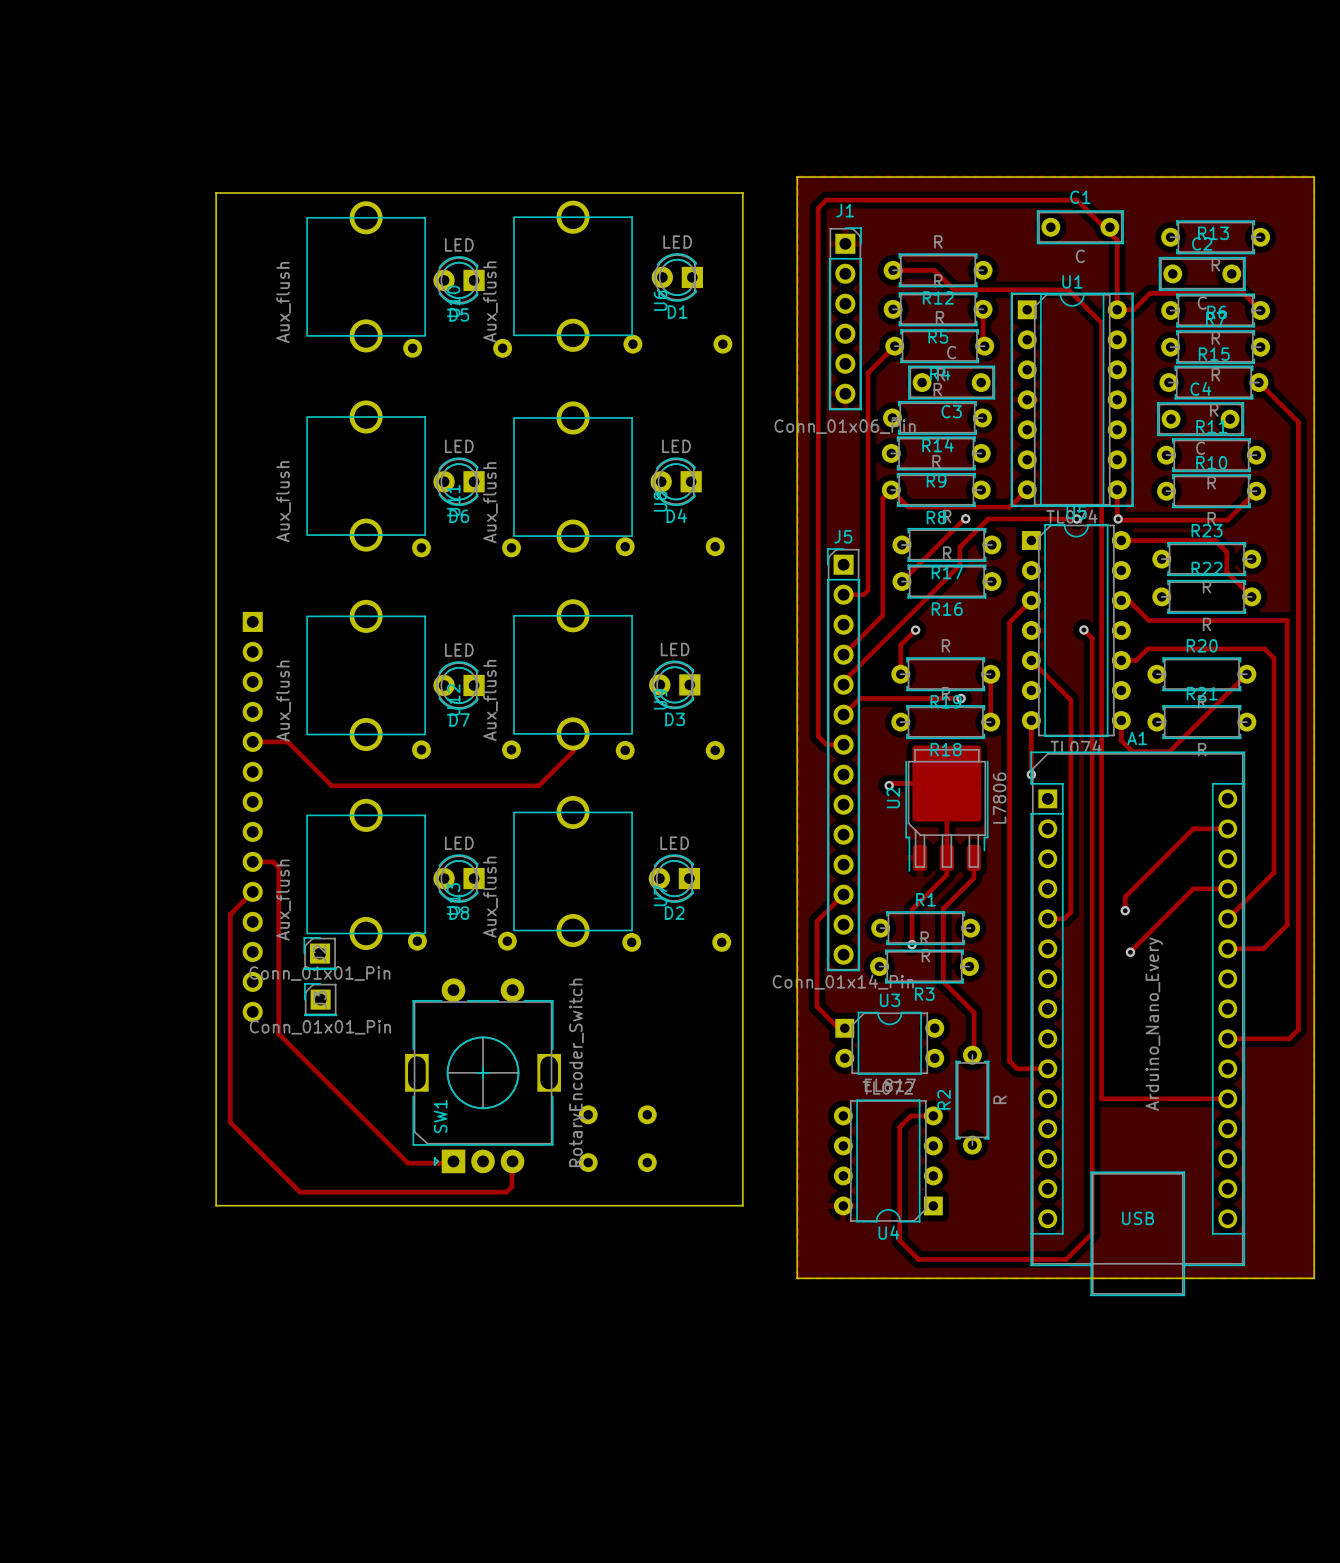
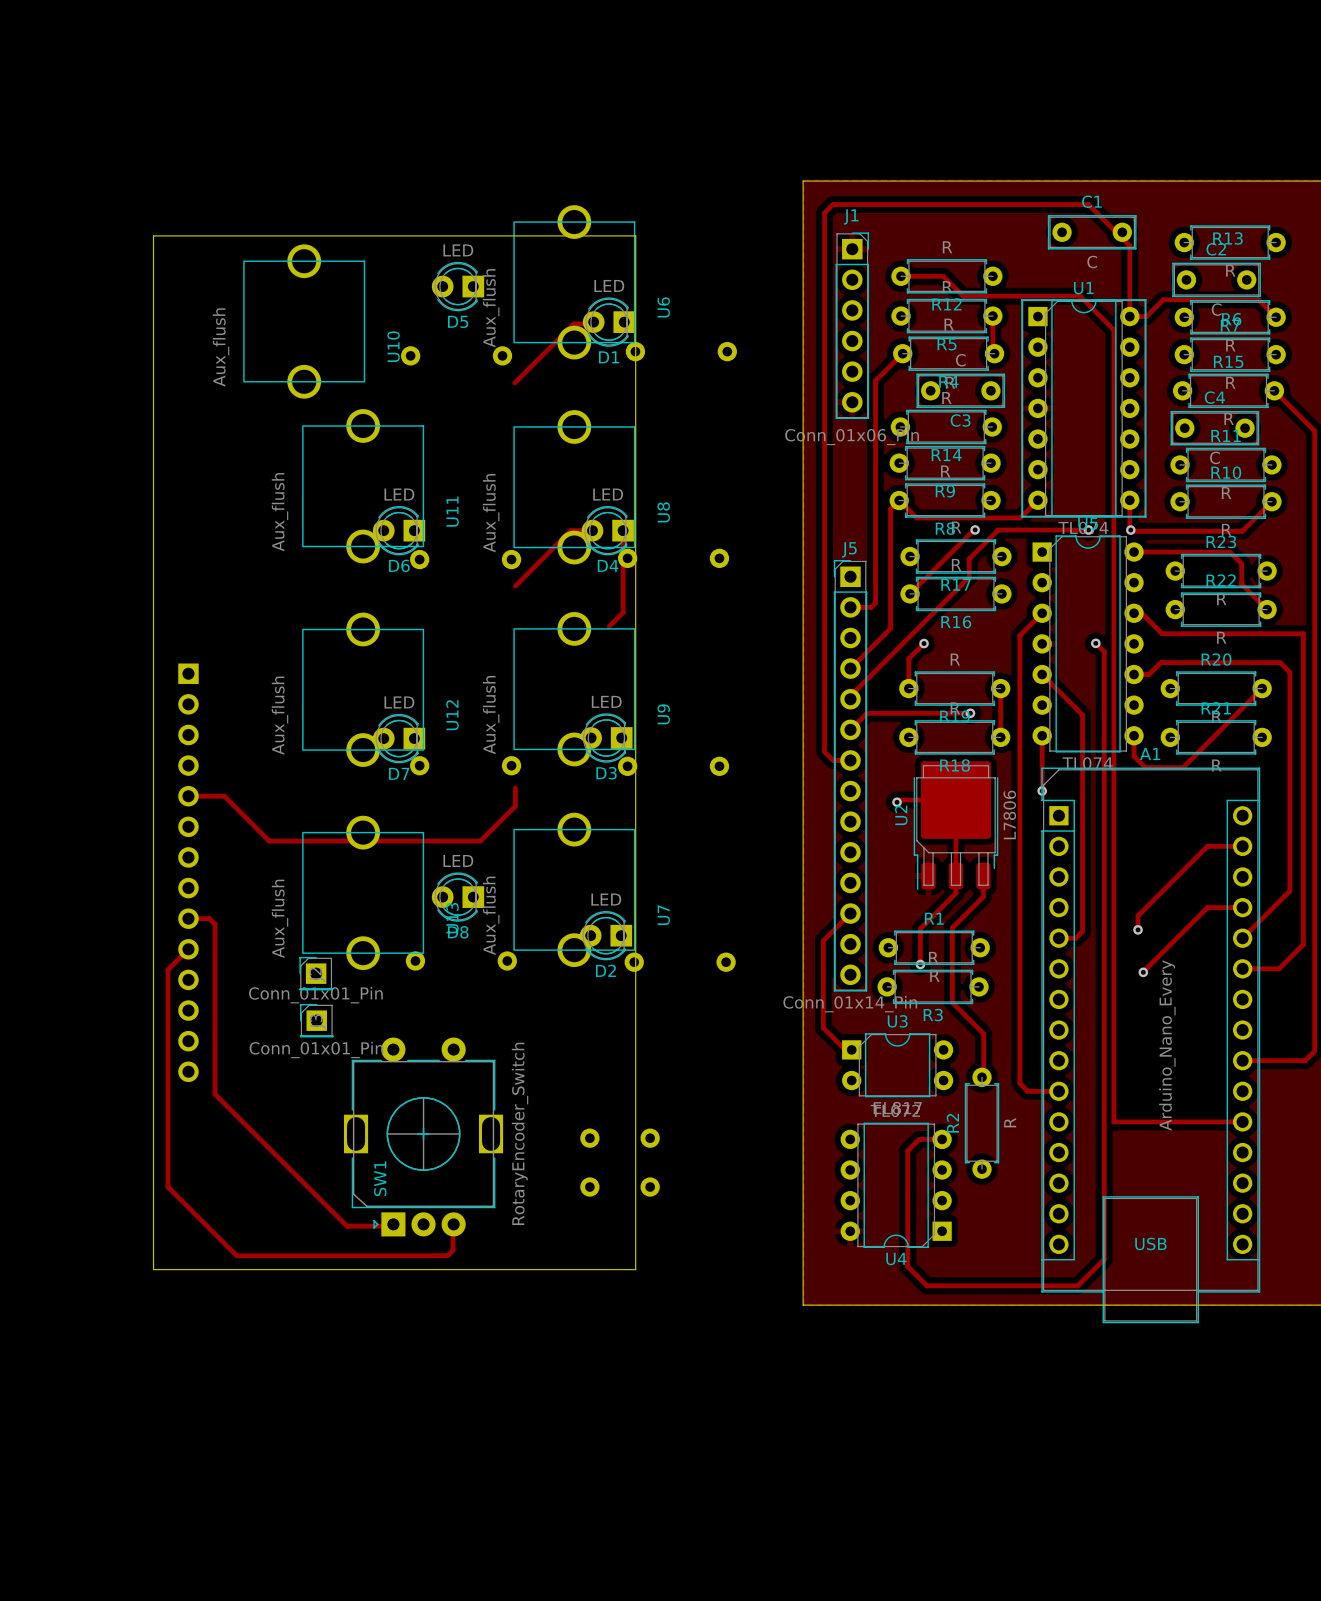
board edge: (216, 193) (742, 193) (742, 1205) (216, 1205) (216, 193) -> (153, 235) (153, 1269) (635, 1269) (635, 235) (153, 235)
U10 position: (366, 276) -> (304, 321)
D1 position: (677, 277) -> (608, 322)
track: none -> (591, 323) (573, 323) (514, 382)
D6 position: (459, 481) -> (399, 530)
D4 position: (676, 481) -> (607, 530)
track: none -> (592, 530) (570, 530) (515, 586)
track: none -> (623, 530) (623, 612) (609, 626)
D3 position: (674, 684) -> (606, 737)
D7 position: (459, 685) -> (399, 738)
track: (573, 733) (573, 751) (538, 785) (331, 785) (287, 741) (252, 741) -> (515, 788) (515, 806) (480, 841) (269, 841) (224, 796) (188, 796)
part position: (252, 816) -> (188, 872)
track: (252, 861) (273, 861) (278, 867) (278, 1033) (408, 1163) (452, 1163) -> (188, 918) (209, 918) (214, 924) (214, 1094) (346, 1226) (392, 1226)
D2 position: (674, 878) -> (605, 935)
track: (252, 891) (230, 914) (230, 1122) (299, 1192) (506, 1192) (511, 1186) (511, 1163) -> none
track: none -> (188, 949) (167, 969) (167, 1187) (236, 1255) (447, 1255) (453, 1250) (453, 1226)
SW1 position: (483, 1075) -> (423, 1136)

